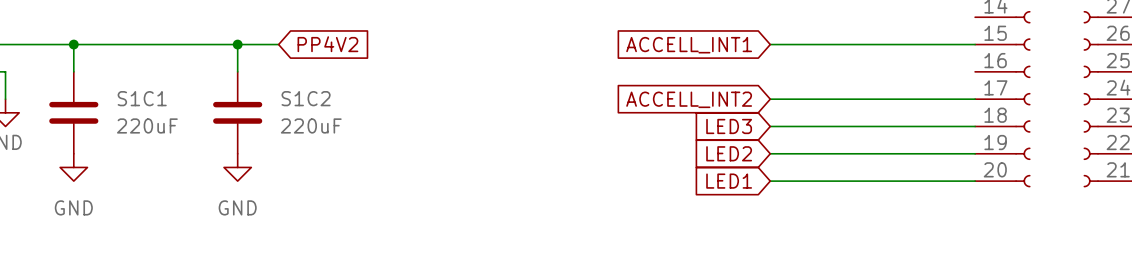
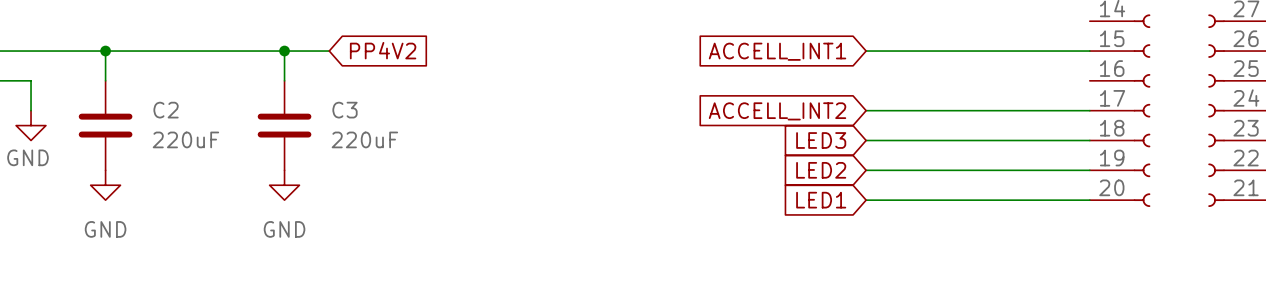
S1C1 name: S1C1 (142, 98) -> C2 (166, 110)
S1C2 name: S1C2 (306, 98) -> C3 (345, 110)

